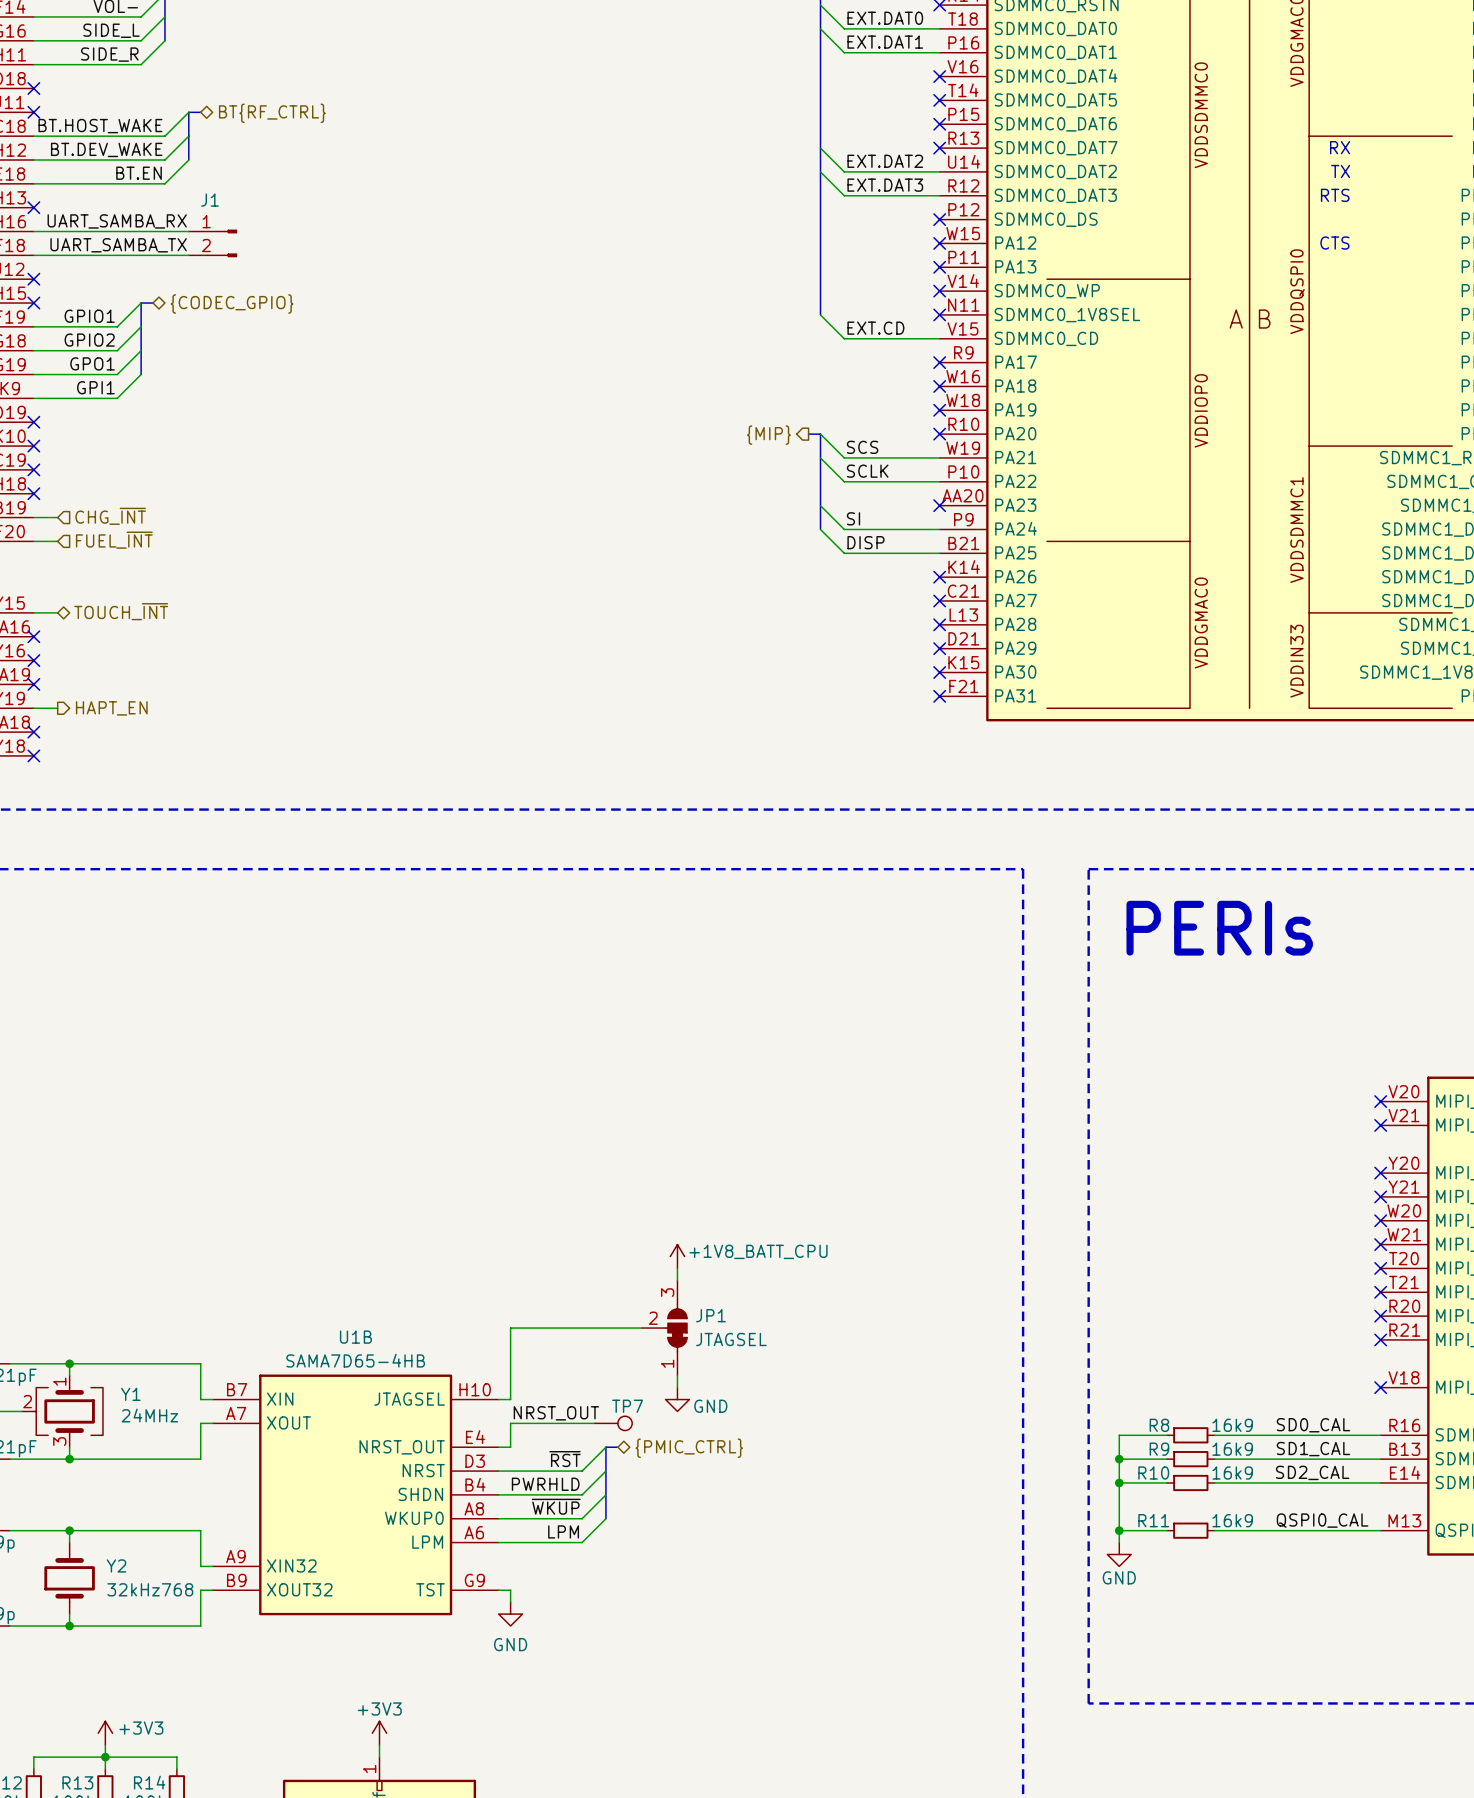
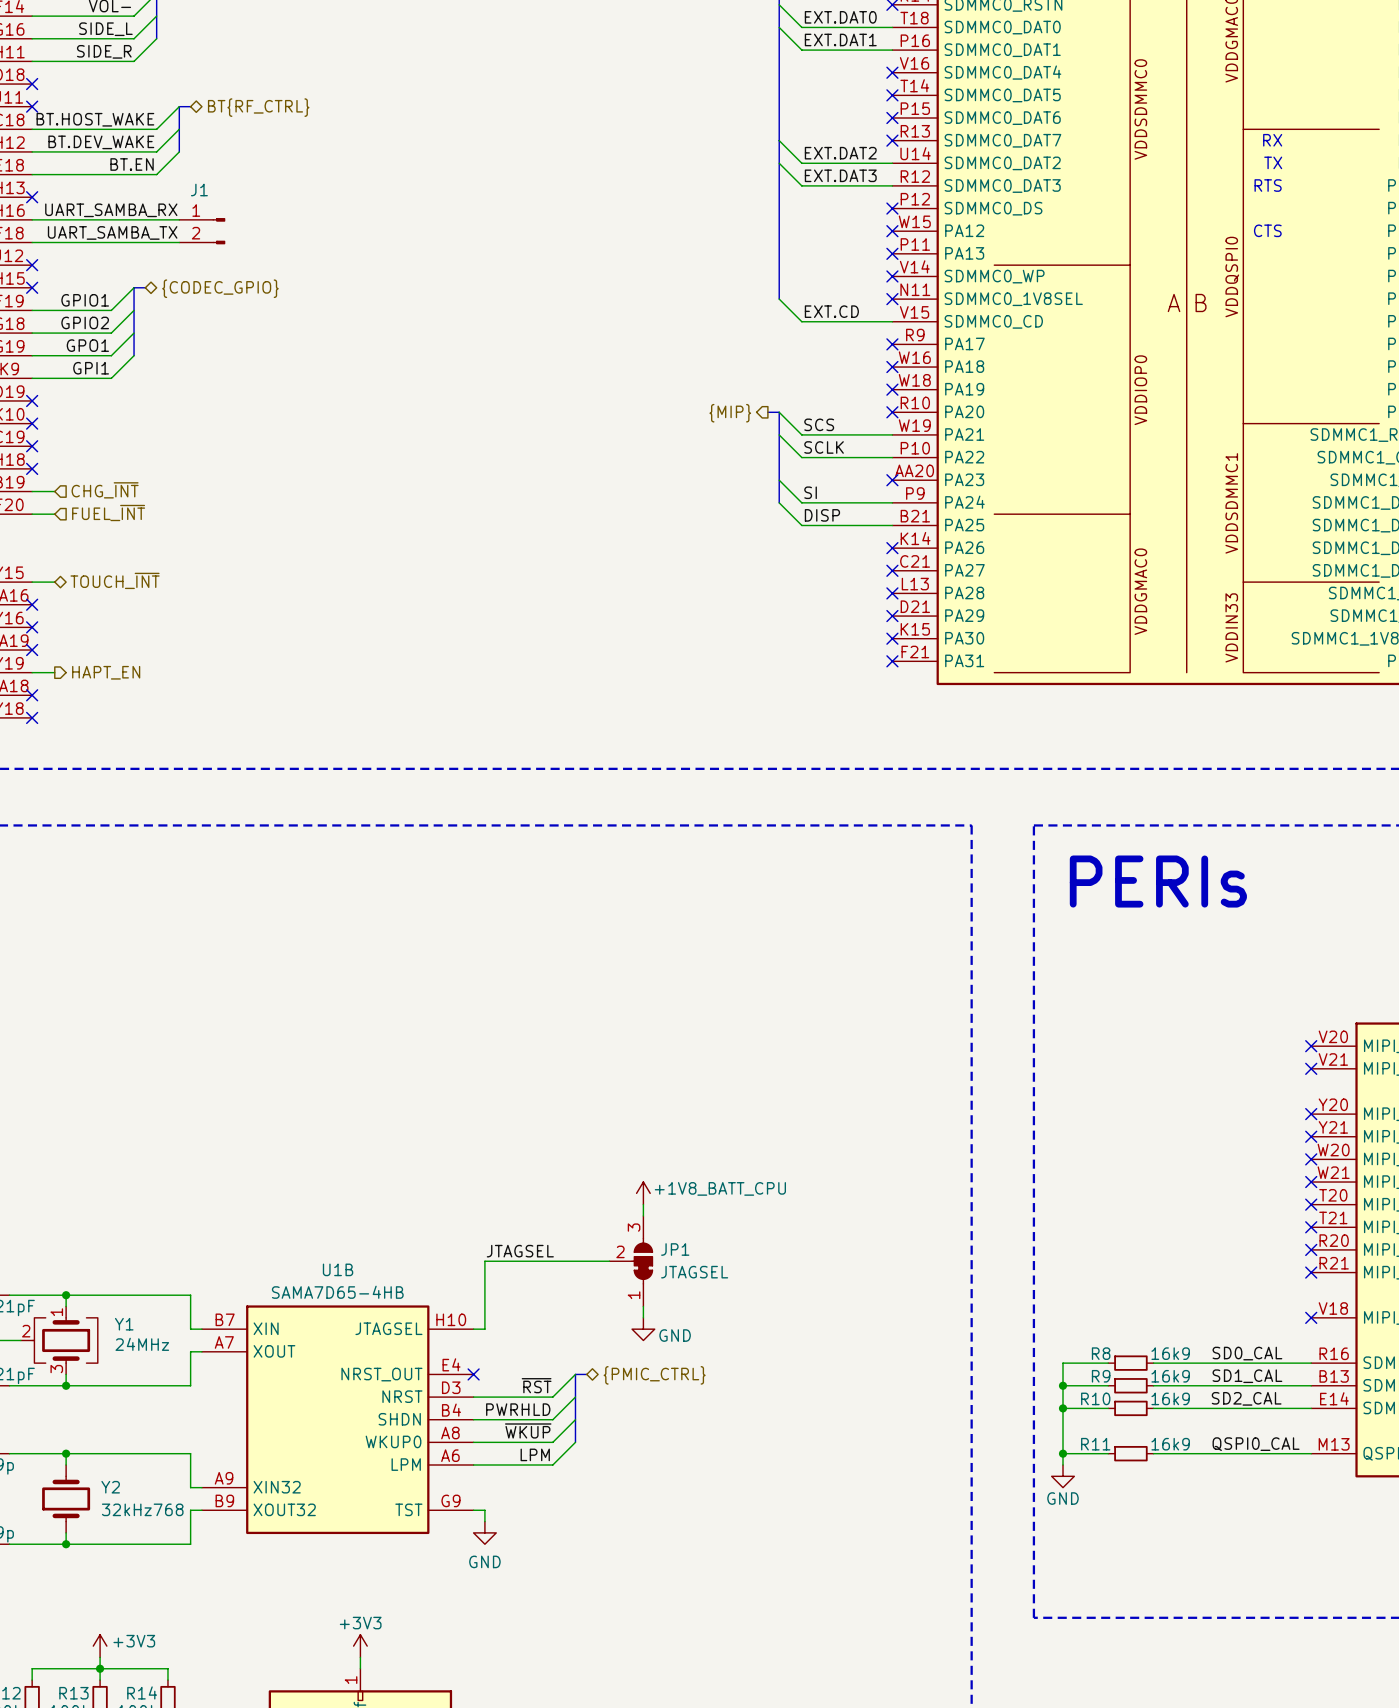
label: none -> JTAGSEL (520, 1251)
label: NRST_OUT (556, 1413) -> none
wire: (594, 1423) (510, 1423) (510, 1447) (498, 1447) -> none
TP7: (613, 1423) -> none
no-connect mark: none -> (473, 1374)

